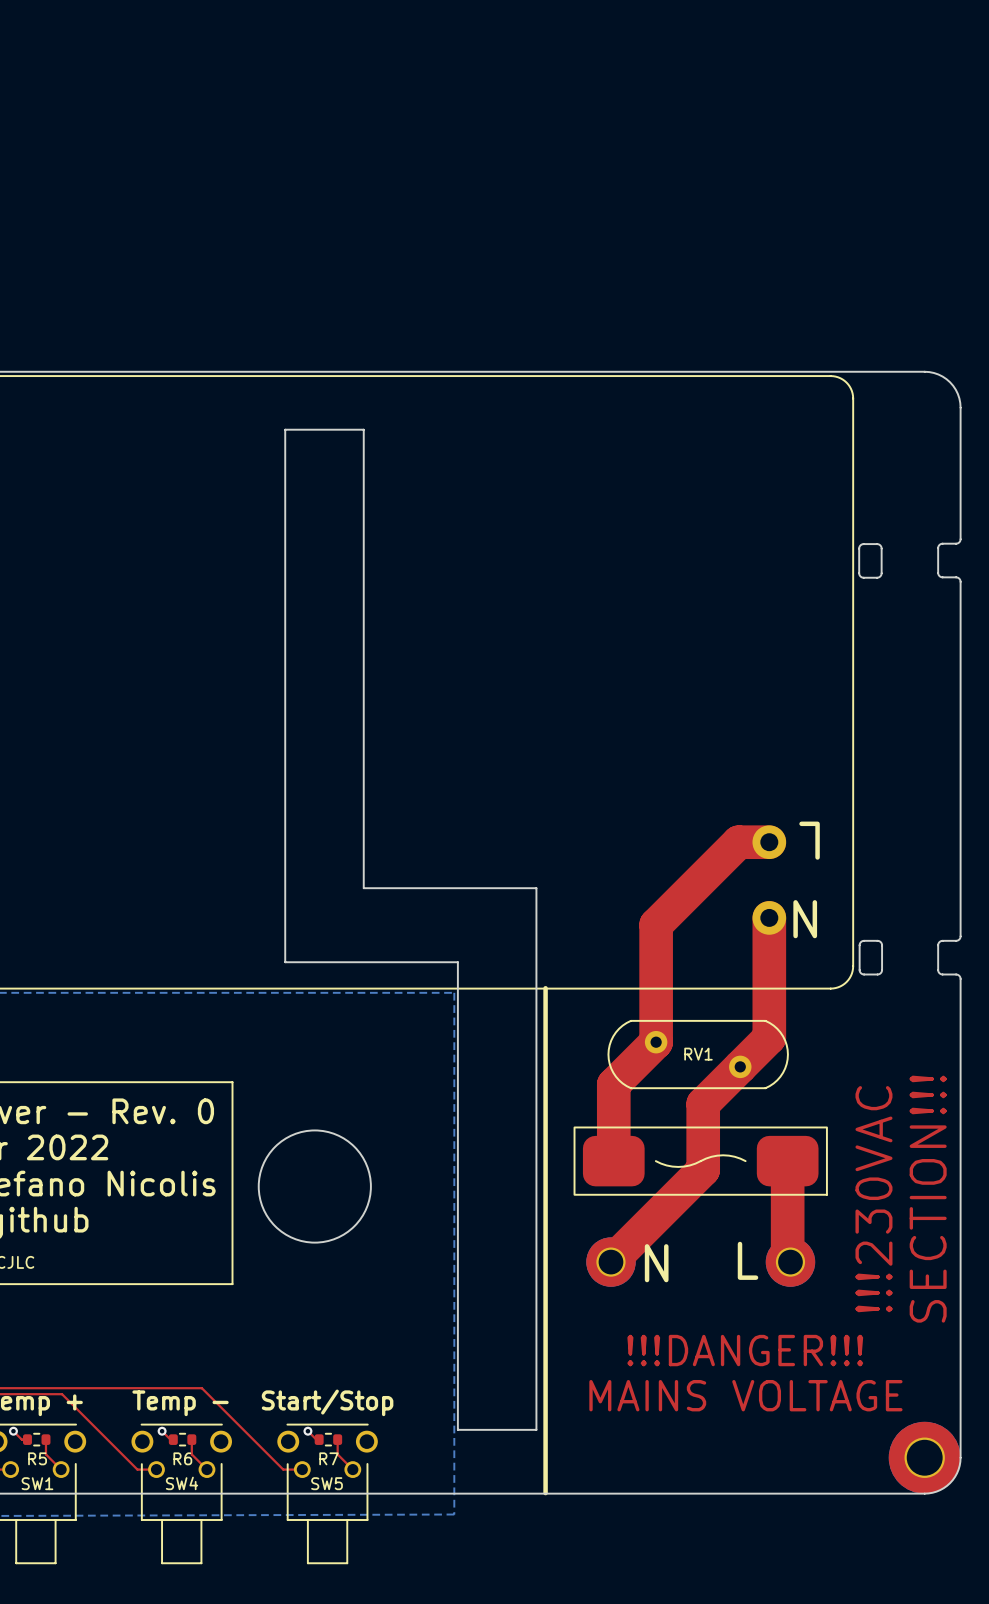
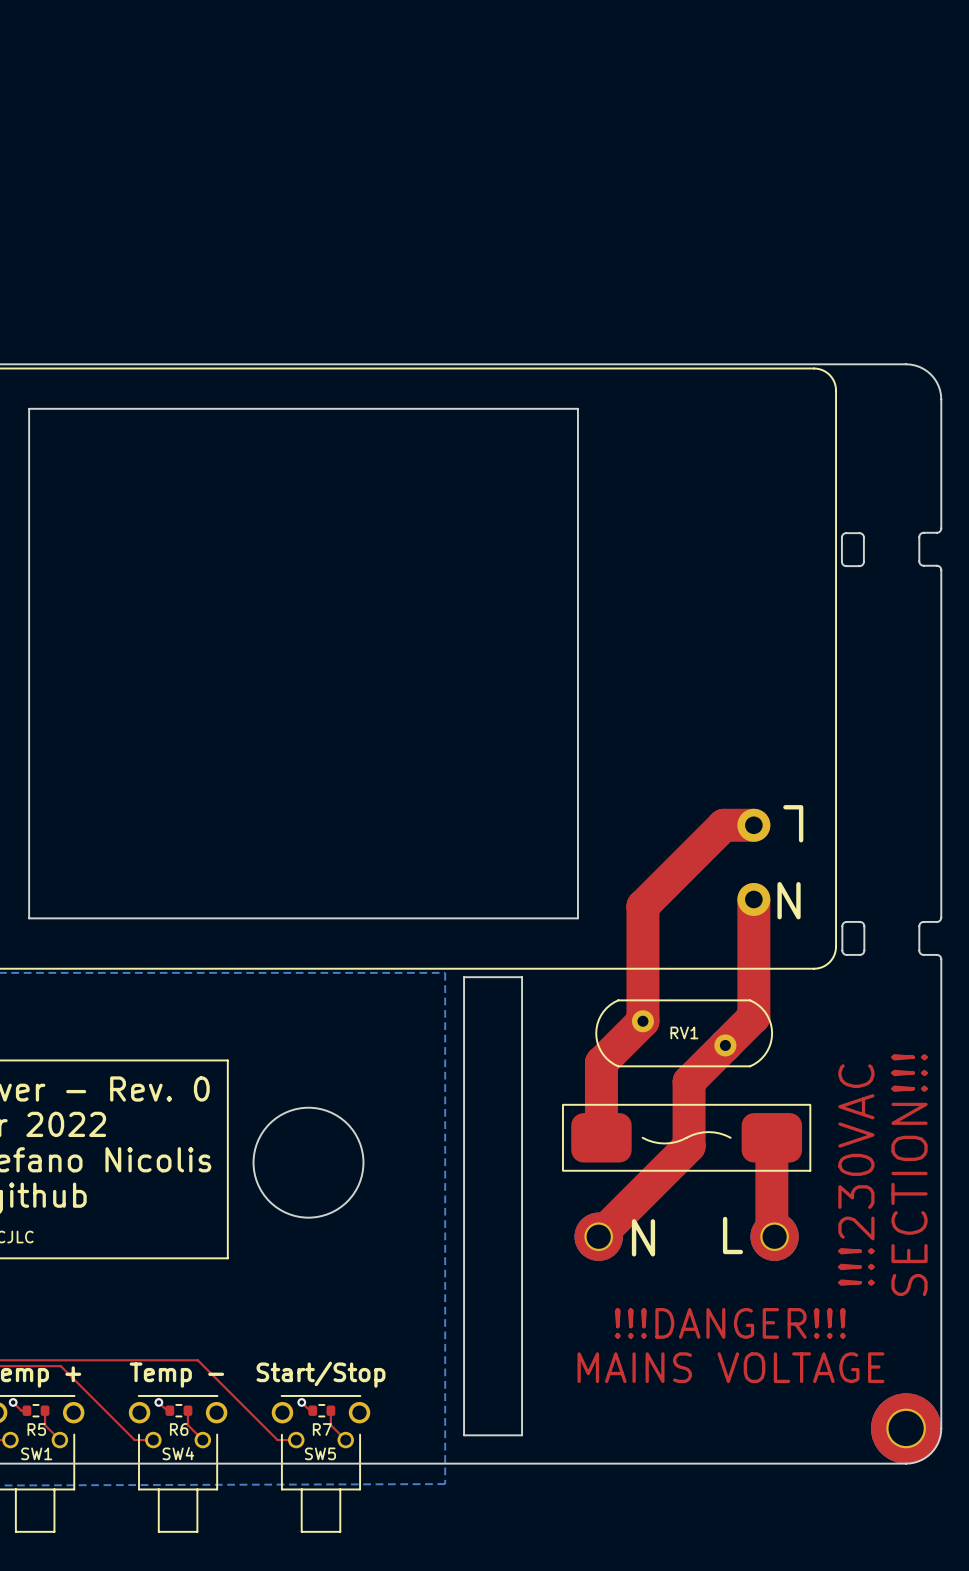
board edge: none -> (29, 408) (577, 408) (577, 918) (29, 918) (29, 408)
board edge: (285, 429) (285, 962) (457, 962) (457, 1429) (536, 1429) (536, 888) (363, 888) (363, 429) (285, 429) -> none
line: (545, 988) (545, 1493) -> none
board edge: none -> (464, 977) (522, 977) (522, 1435) (464, 1435) (464, 977)

